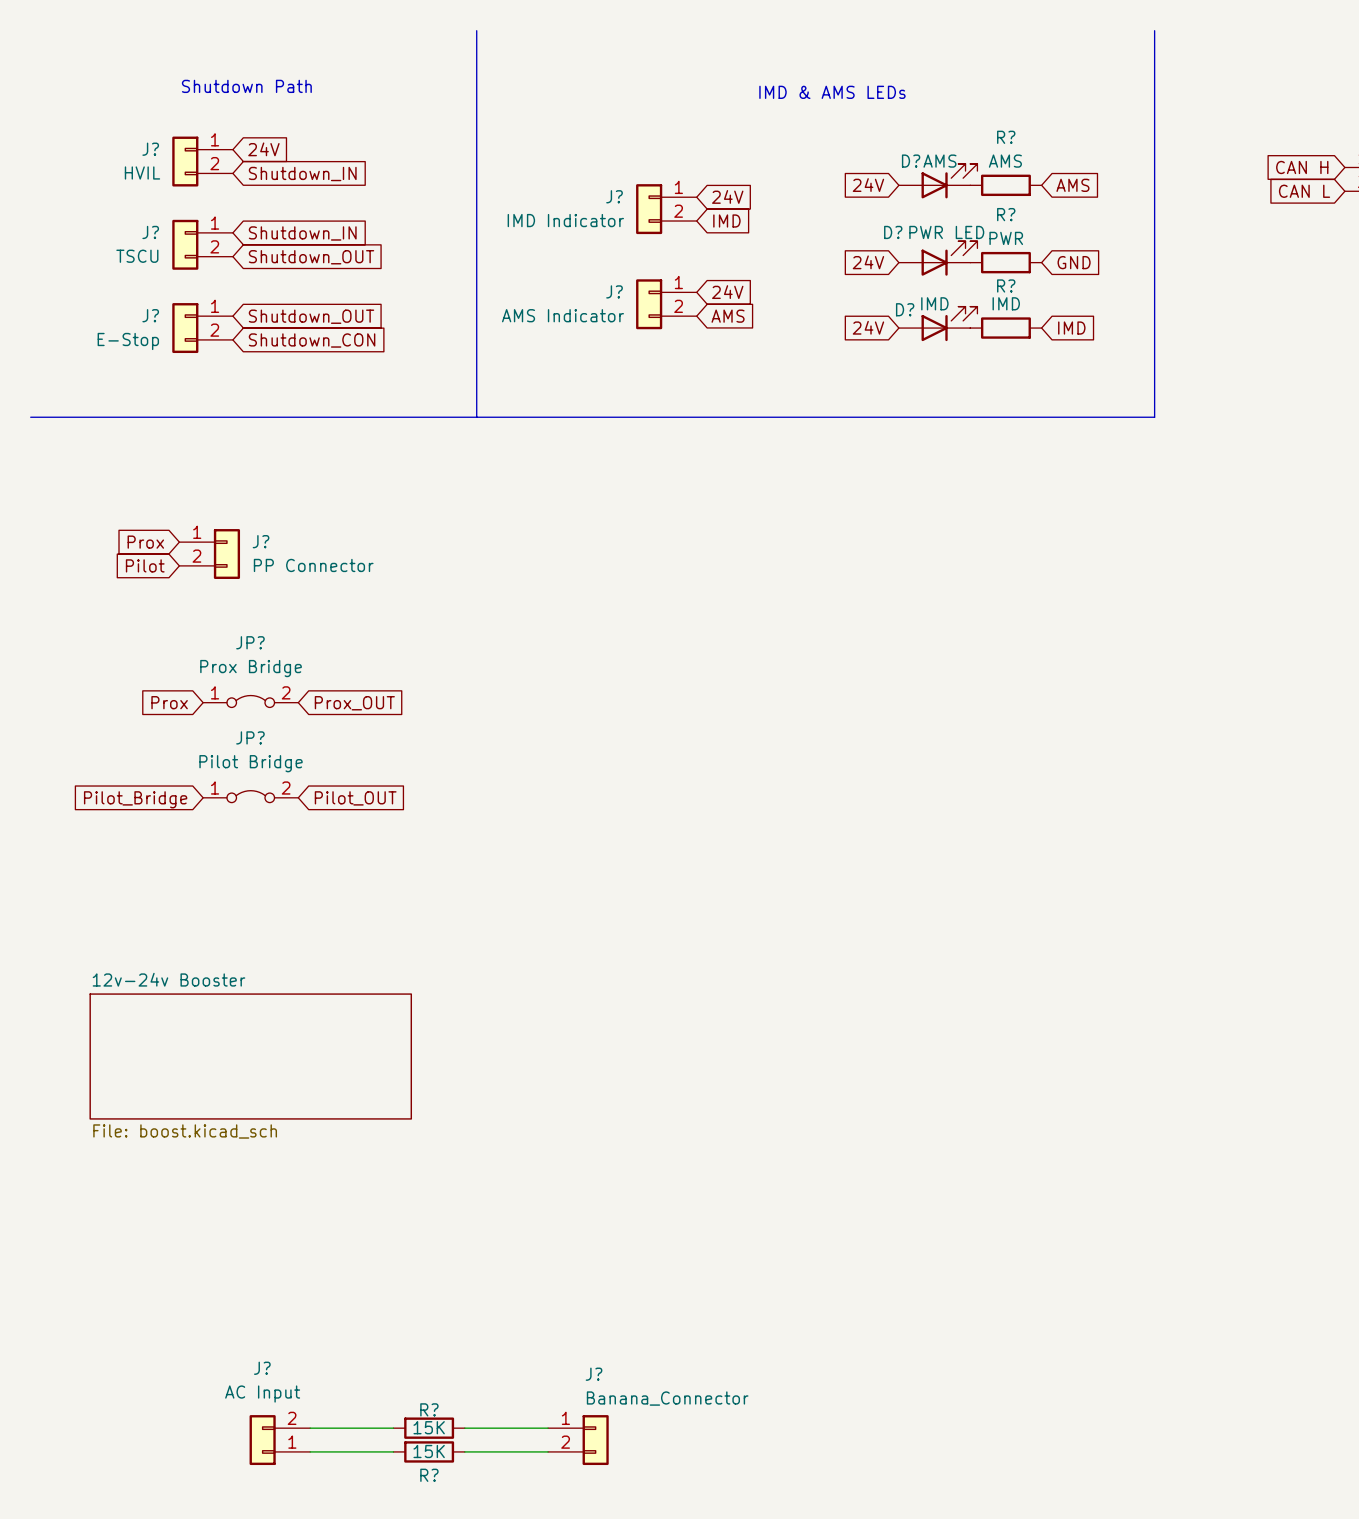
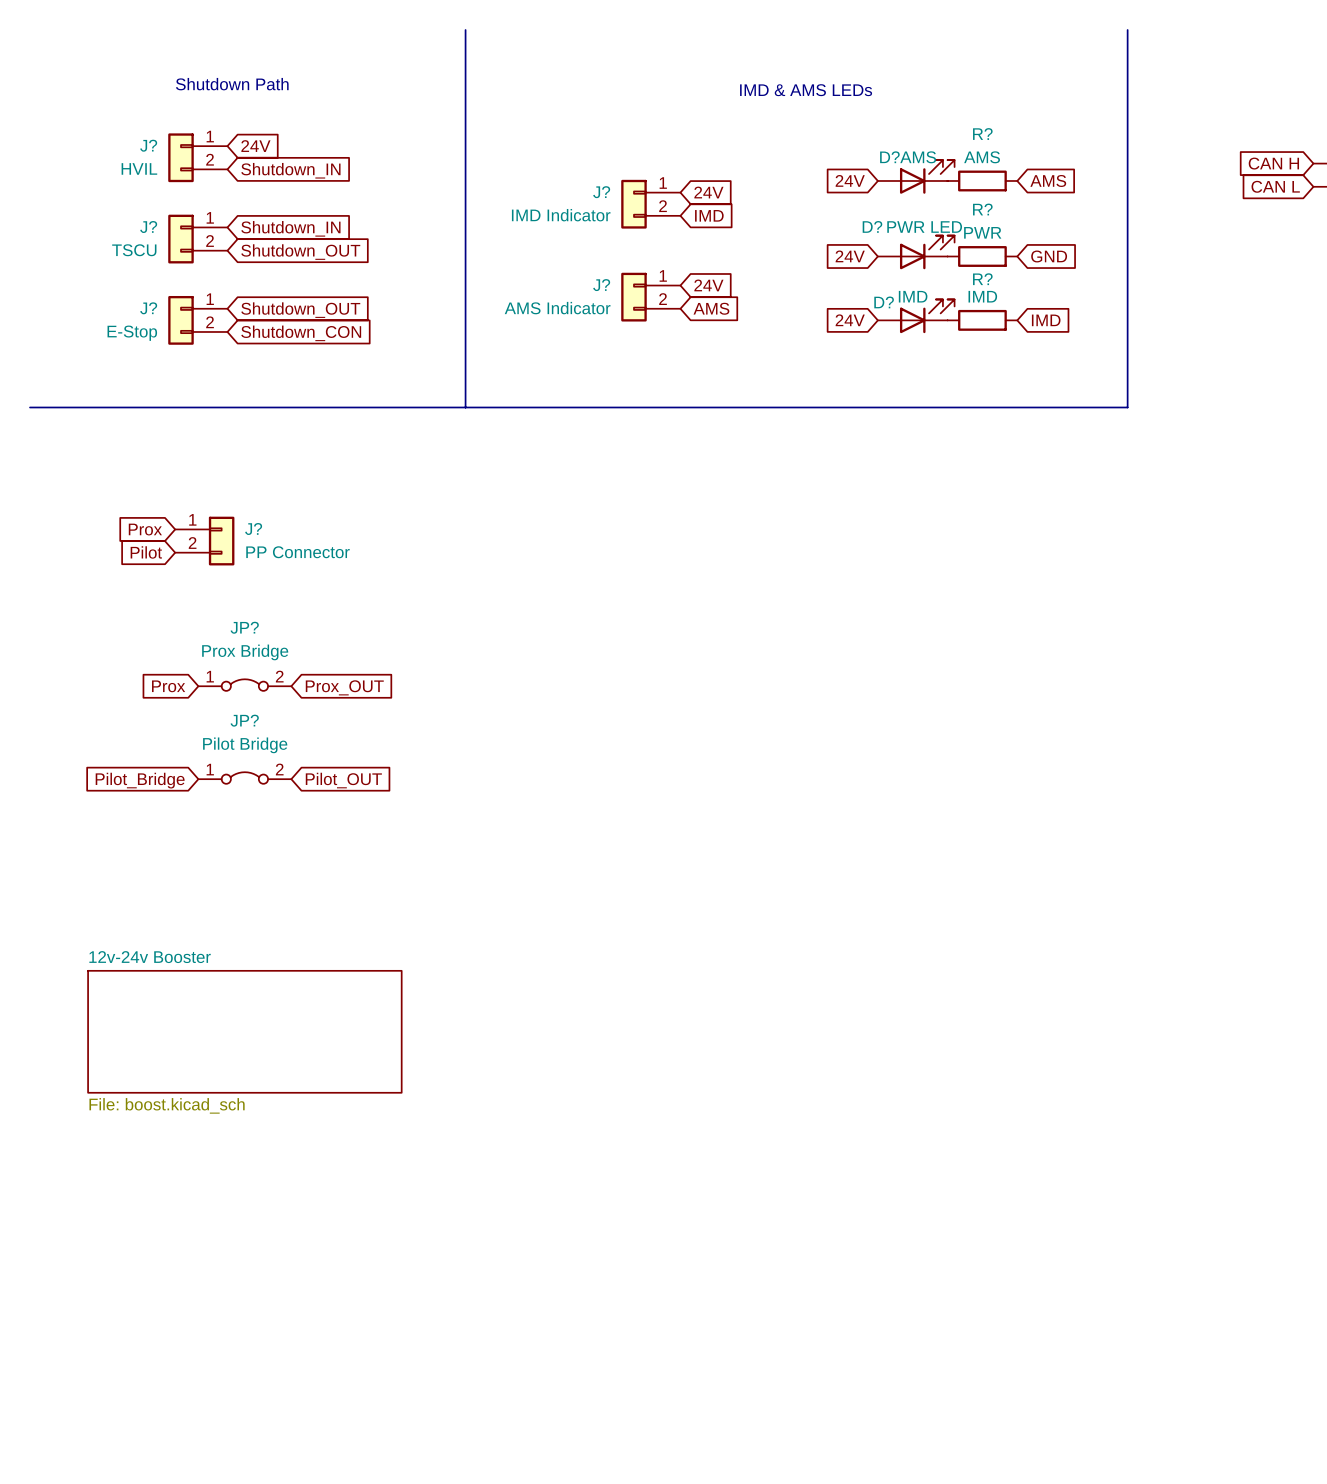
wire: (310, 1428) (393, 1428) -> none
R?: 15K (429, 1428) -> none
wire: (464, 1428) (548, 1428) -> none
J?: AC Input (279, 1440) -> none
J?: Banana_Connector (578, 1440) -> none
wire: (310, 1451) (393, 1451) -> none
R?: 15K (429, 1451) -> none
wire: (464, 1451) (548, 1451) -> none

